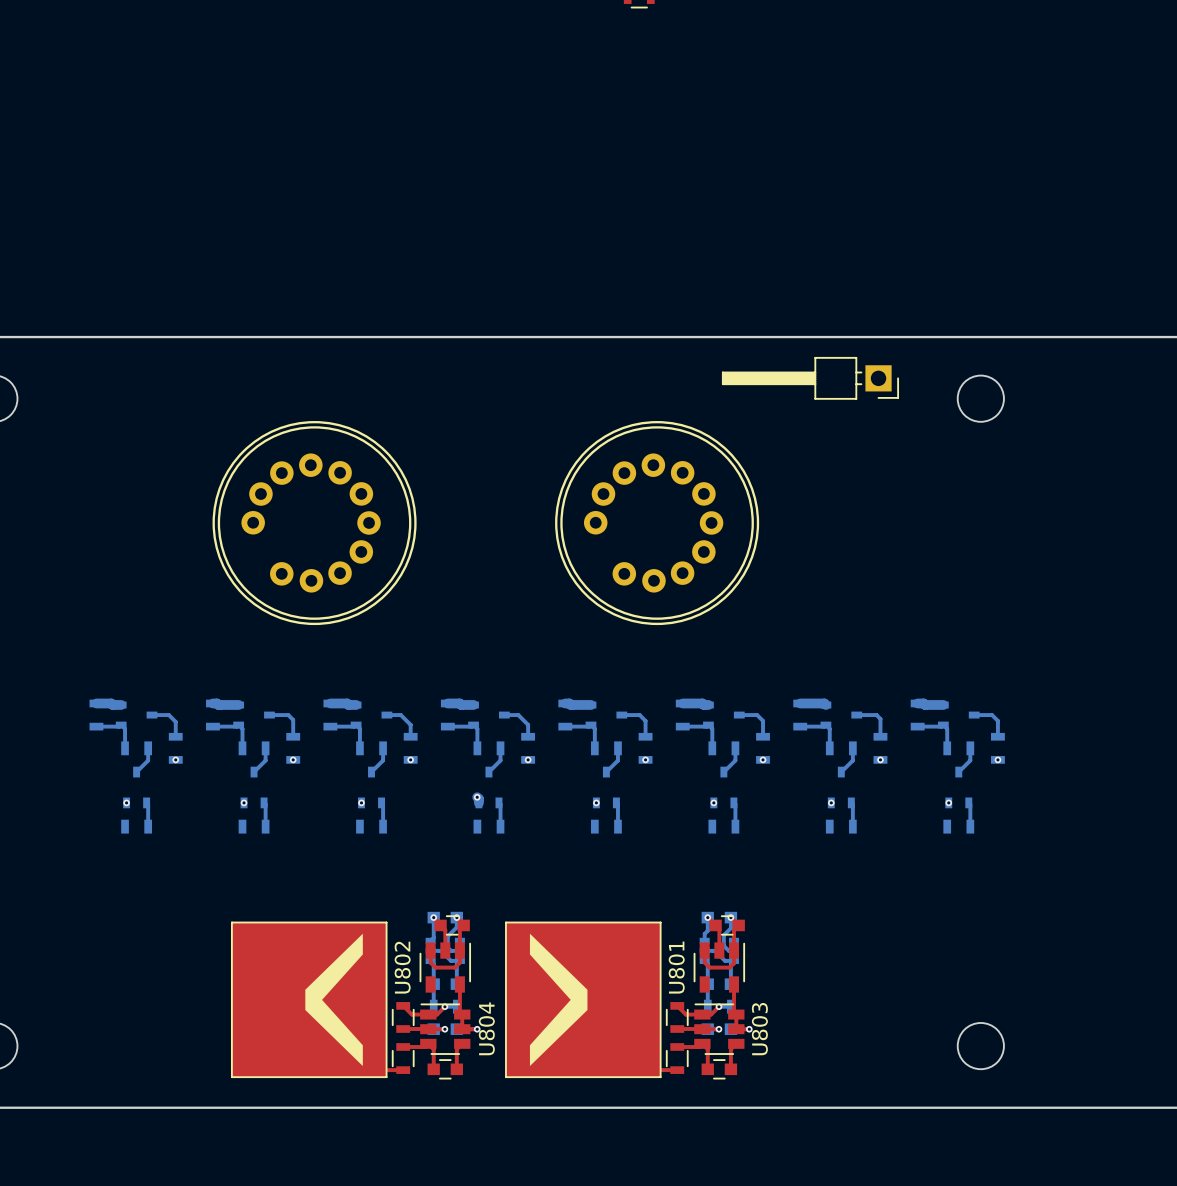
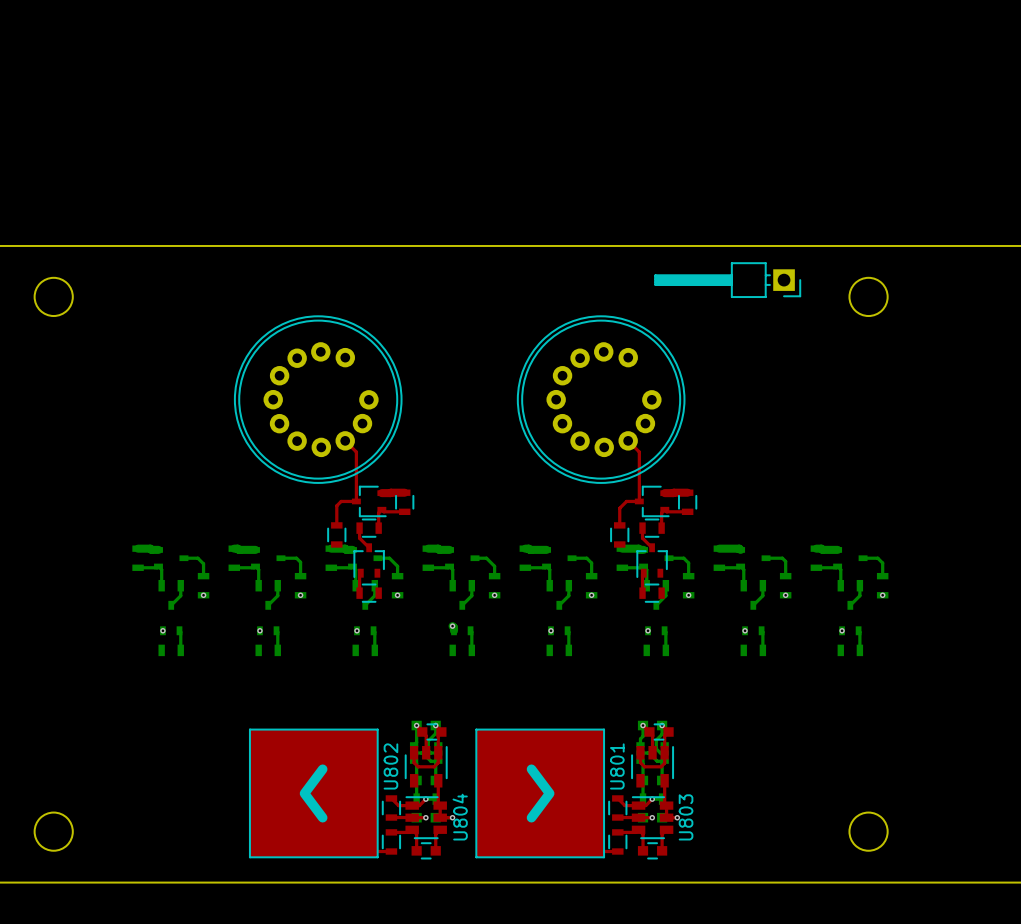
part rotation: 0° (314, 523) -> 180° (318, 399)
part rotation: 0° (657, 523) -> 180° (601, 399)
top track: none -> (345, 440) (356, 452) (356, 501) (341, 501) (336, 505) (336, 525)
top track: none -> (628, 440) (639, 452) (639, 501) (626, 501) (619, 508) (619, 525)
top track: none -> (404, 492) (381, 493)
top track: none -> (687, 492) (664, 493)
part: none -> (369, 501)
part: none -> (652, 501)
part: none -> (404, 502)
part: none -> (687, 502)
top track: none -> (404, 511) (383, 511) (381, 509) (378, 512) (378, 528)
top track: none -> (687, 511) (666, 511) (664, 509) (661, 512) (661, 528)
top track: none -> (359, 528) (359, 538) (369, 547)
part: none -> (369, 528)
top track: none -> (642, 528) (642, 538) (652, 547)
part: none -> (652, 528)
part: none -> (336, 534)
part: none -> (619, 534)
part: none -> (369, 560)
part: none -> (652, 560)
top track: none -> (360, 573) (359, 593)
top track: none -> (643, 573) (642, 593)
part: none -> (369, 593)
part: none -> (652, 593)

